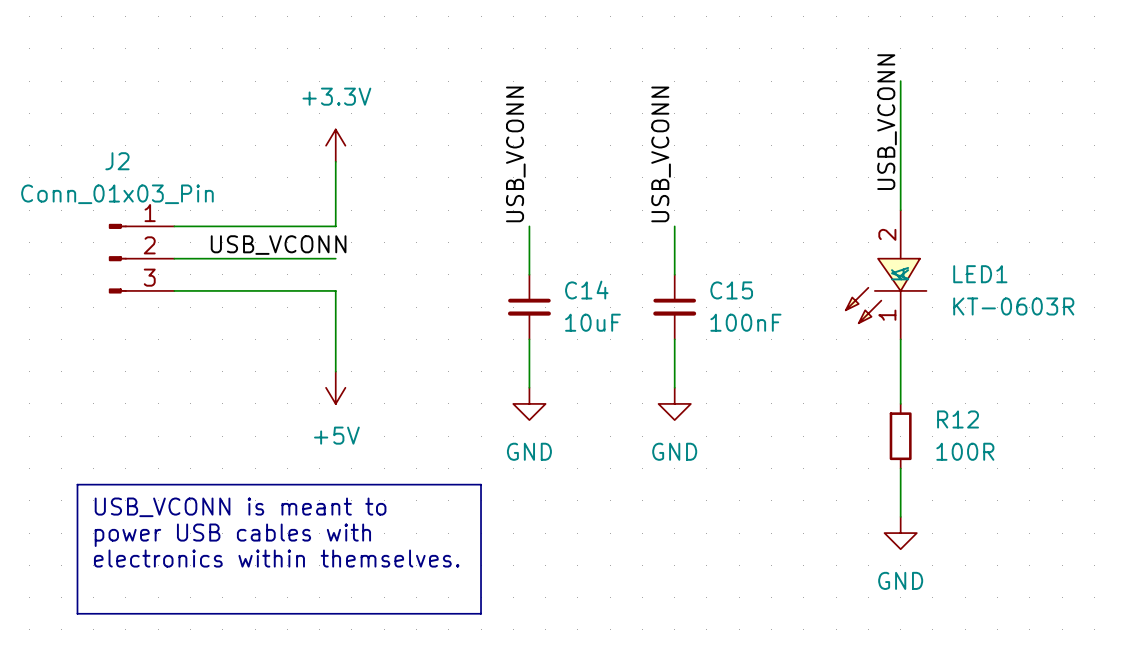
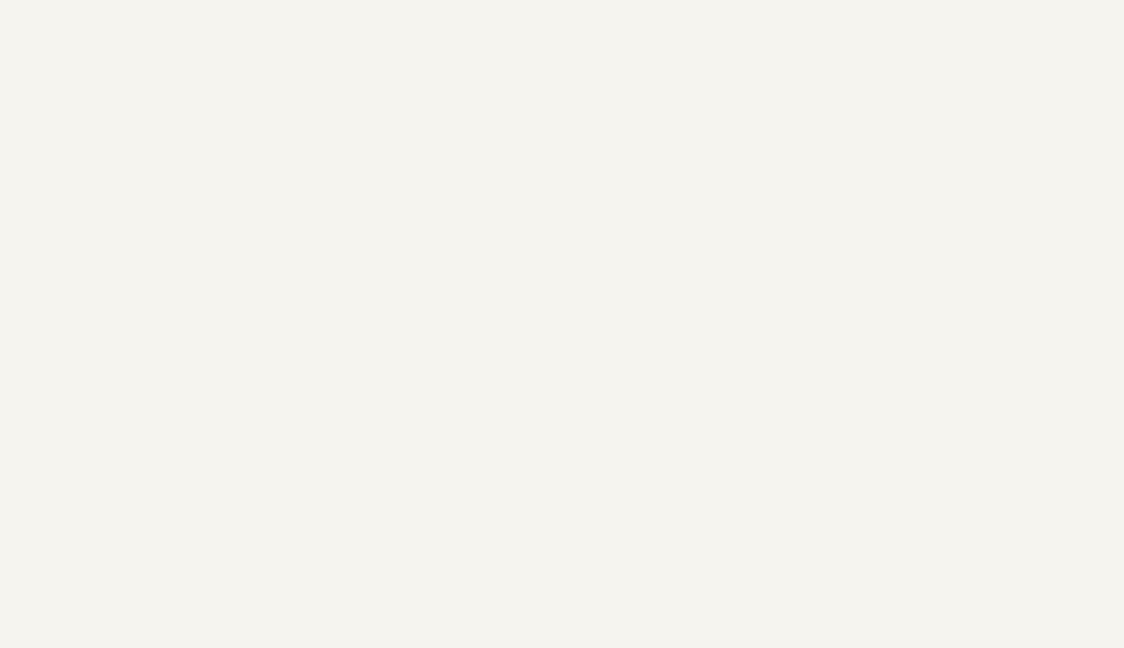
wire: (900, 81) (900, 210) -> none
label: USB_VCONN (887, 122) -> none
power symbol: +3.3V (335, 145) -> none
label: USB_VCONN (515, 154) -> none
label: USB_VCONN (661, 154) -> none
wire: (335, 161) (335, 226) (174, 226) -> none
wire: (529, 226) (529, 274) -> none
wire: (674, 226) (674, 274) -> none
label: USB_VCONN (278, 245) -> none
J2: Conn_01x03_Pin (141, 258) -> none
wire: (174, 258) (335, 258) -> none
LED1: KT-0603R (886, 274) -> none
wire: (174, 290) (335, 290) (335, 371) -> none
C14: 10uF (529, 307) -> none
C15: 100nF (674, 307) -> none
wire: (529, 339) (529, 387) -> none
wire: (674, 339) (674, 387) -> none
wire: (900, 339) (900, 403) -> none
power symbol: +5V (335, 387) -> none
power symbol: GND (529, 403) -> none
power symbol: GND (674, 403) -> none
R12: 100R (900, 436) -> none
wire: (900, 468) (900, 516) -> none
line: (77, 484) (481, 484) (481, 613) (77, 613) (77, 484) -> none
text: USB_VCONN is meant to (240, 507) -> none
power symbol: GND (900, 533) -> none
text: power USB cables with (232, 535) -> none
text: electronics within themselves. (276, 558) -> none

